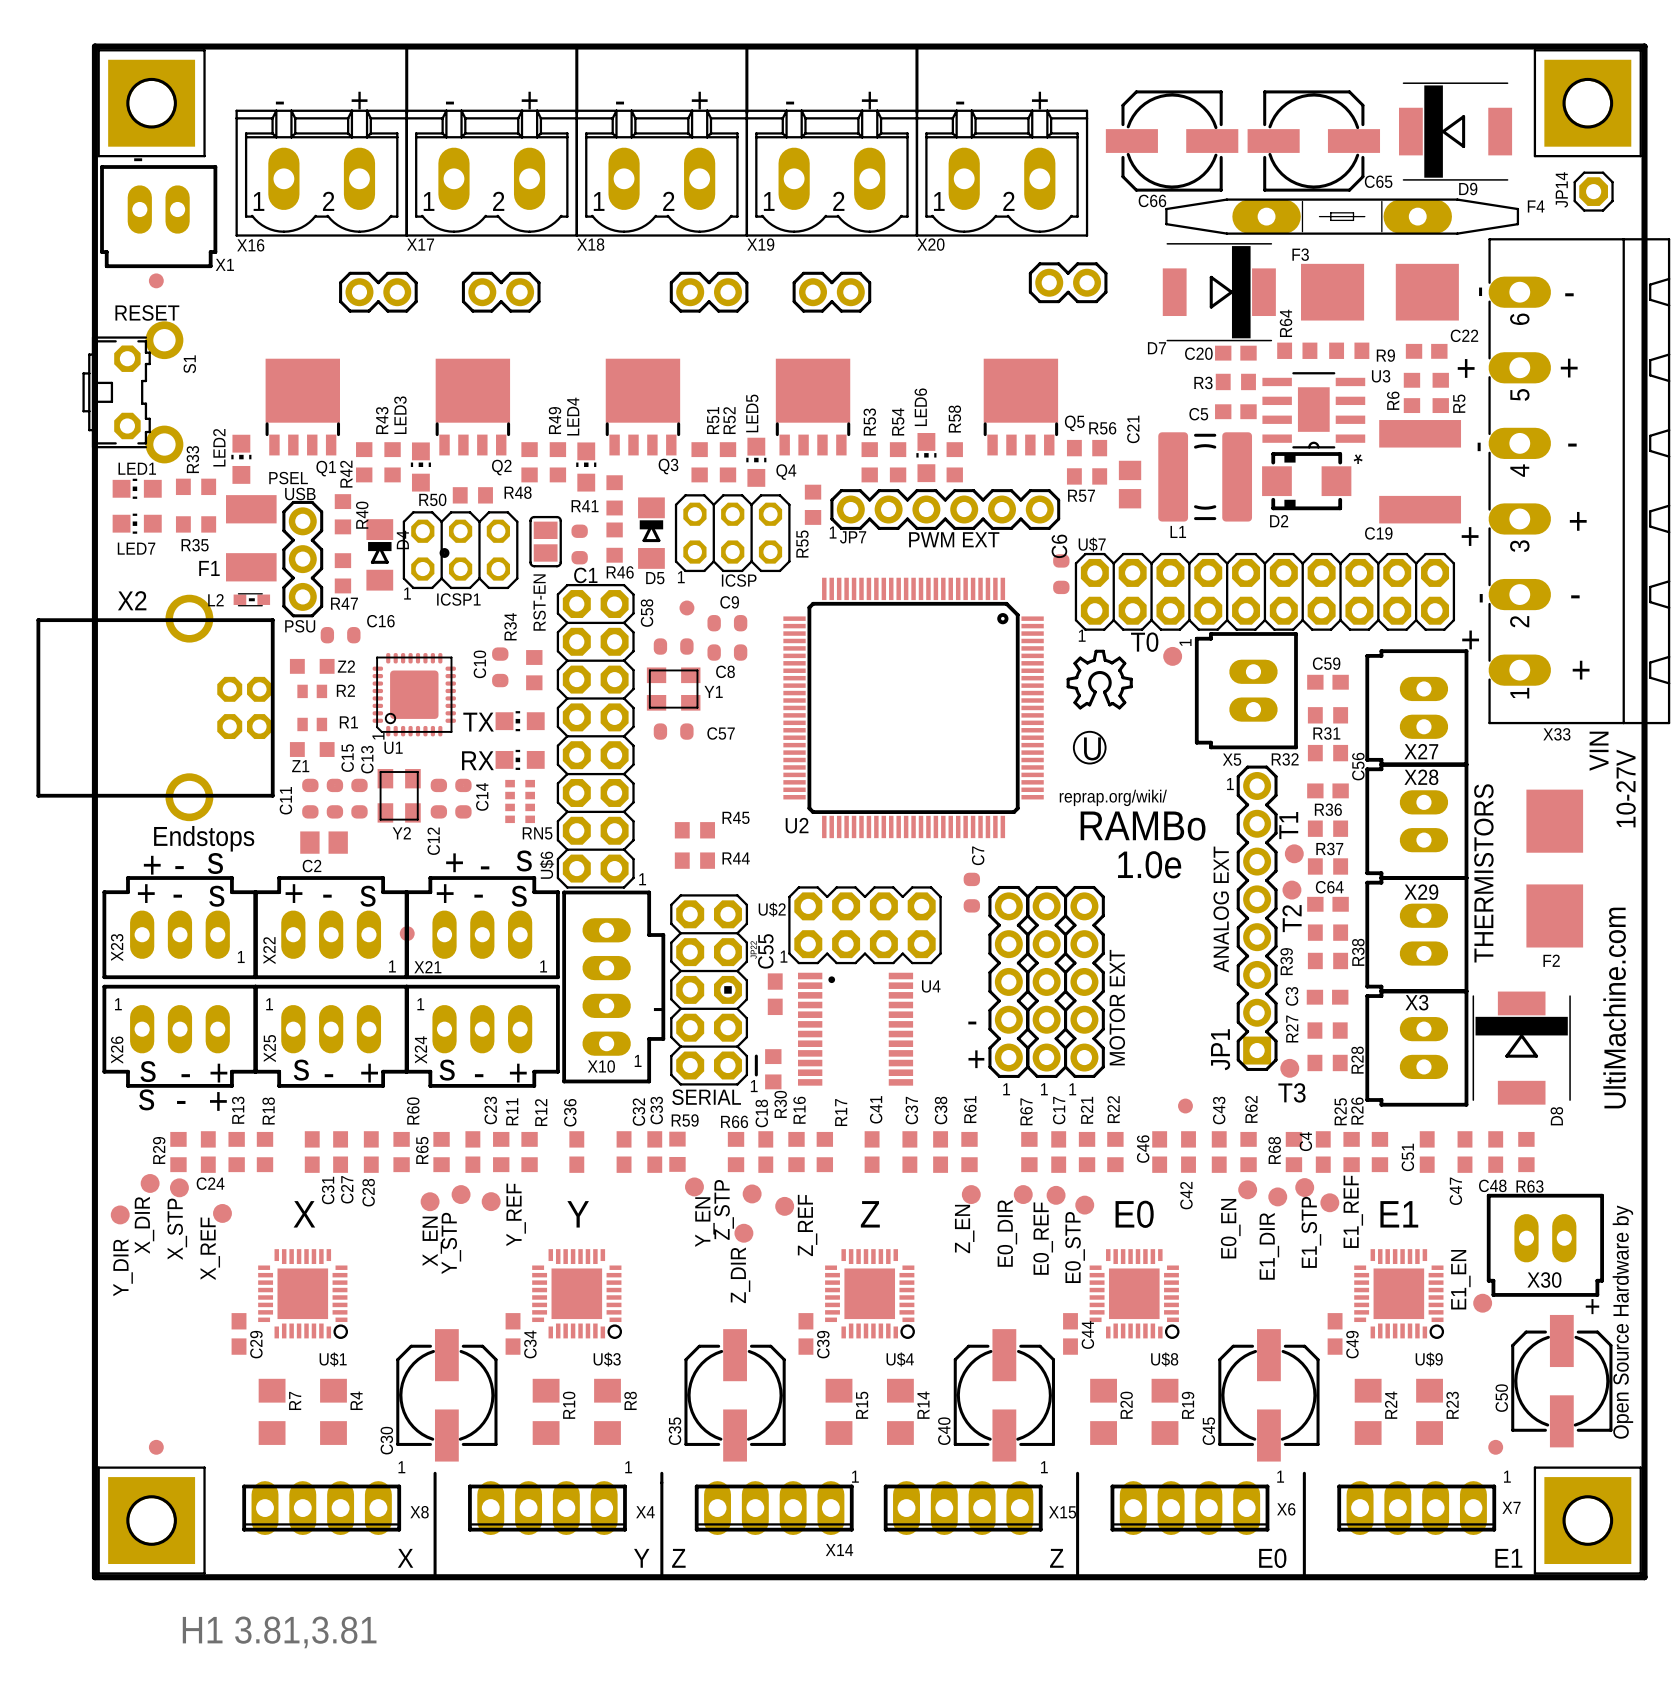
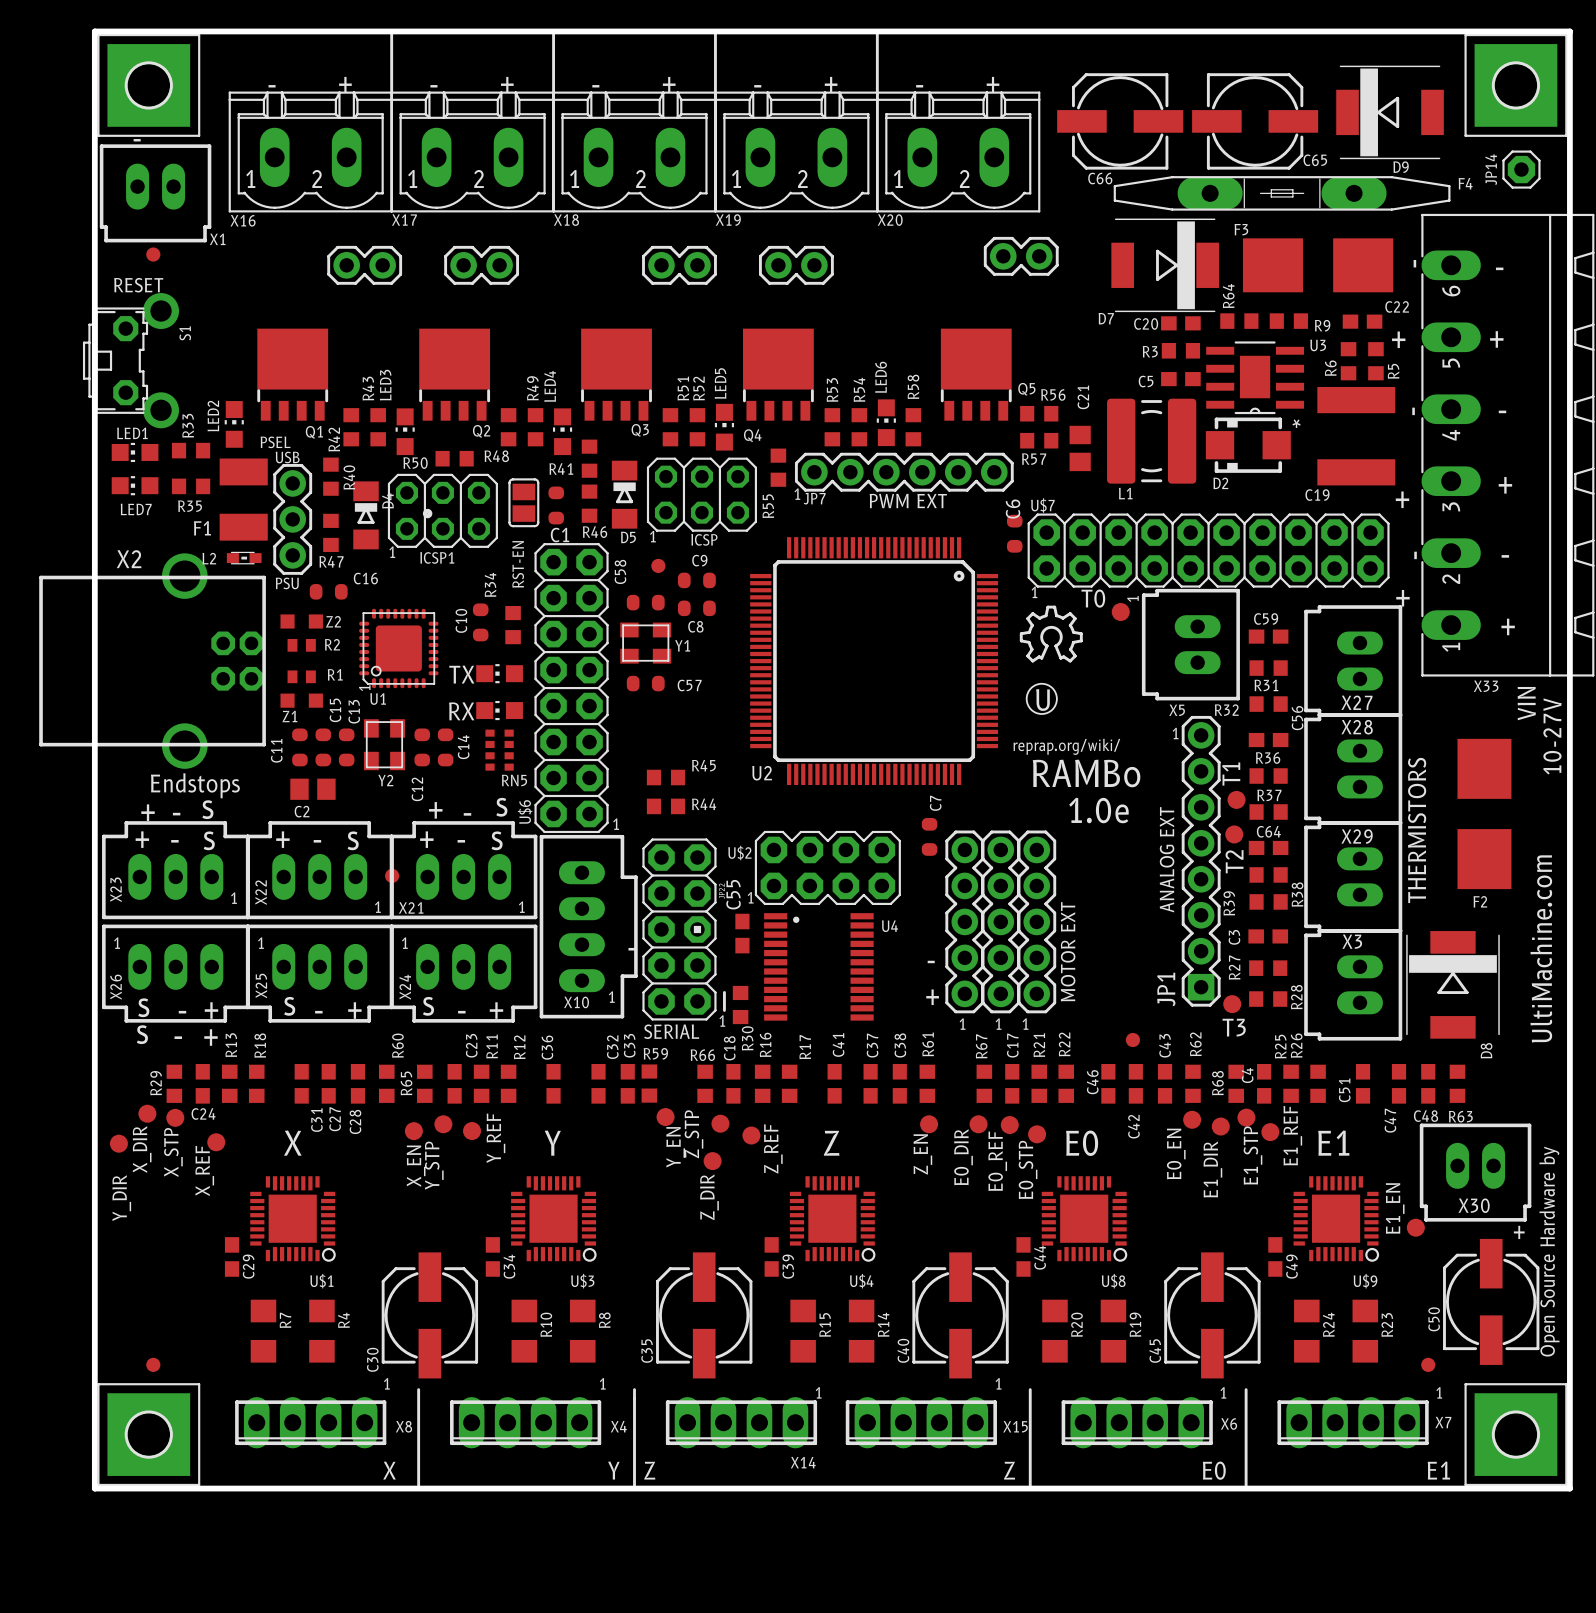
text: H1 3.81,3.81 (279, 1632) -> none

